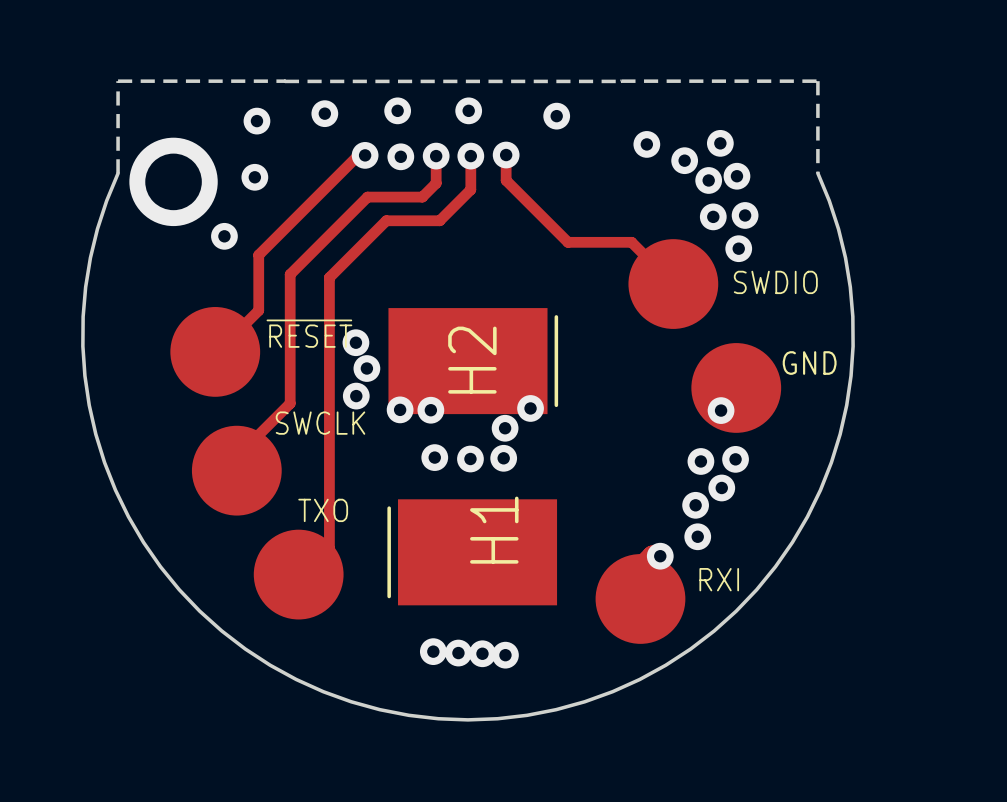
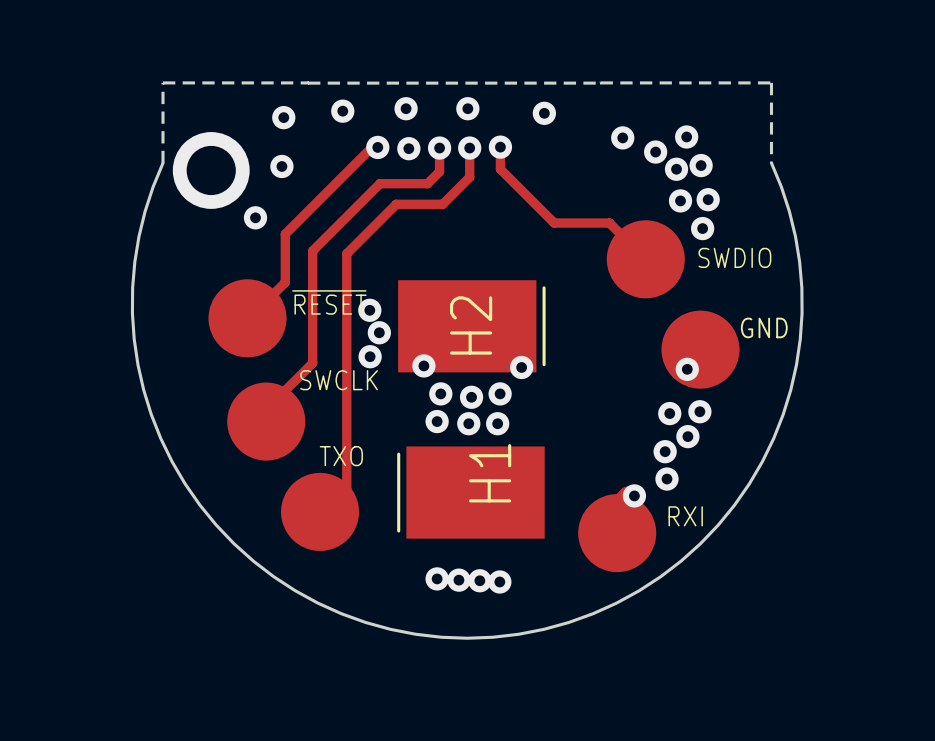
via: none -> (423, 365)
via: (400, 409) -> none
via: (430, 410) -> none
via: (505, 428) -> none
via: none -> (440, 393)
via: none -> (500, 393)
via: none -> (471, 397)
via: (434, 457) -> none
via: (503, 458) -> none
via: (470, 459) -> none
via: none -> (437, 421)
via: none -> (468, 423)
via: none -> (497, 423)

